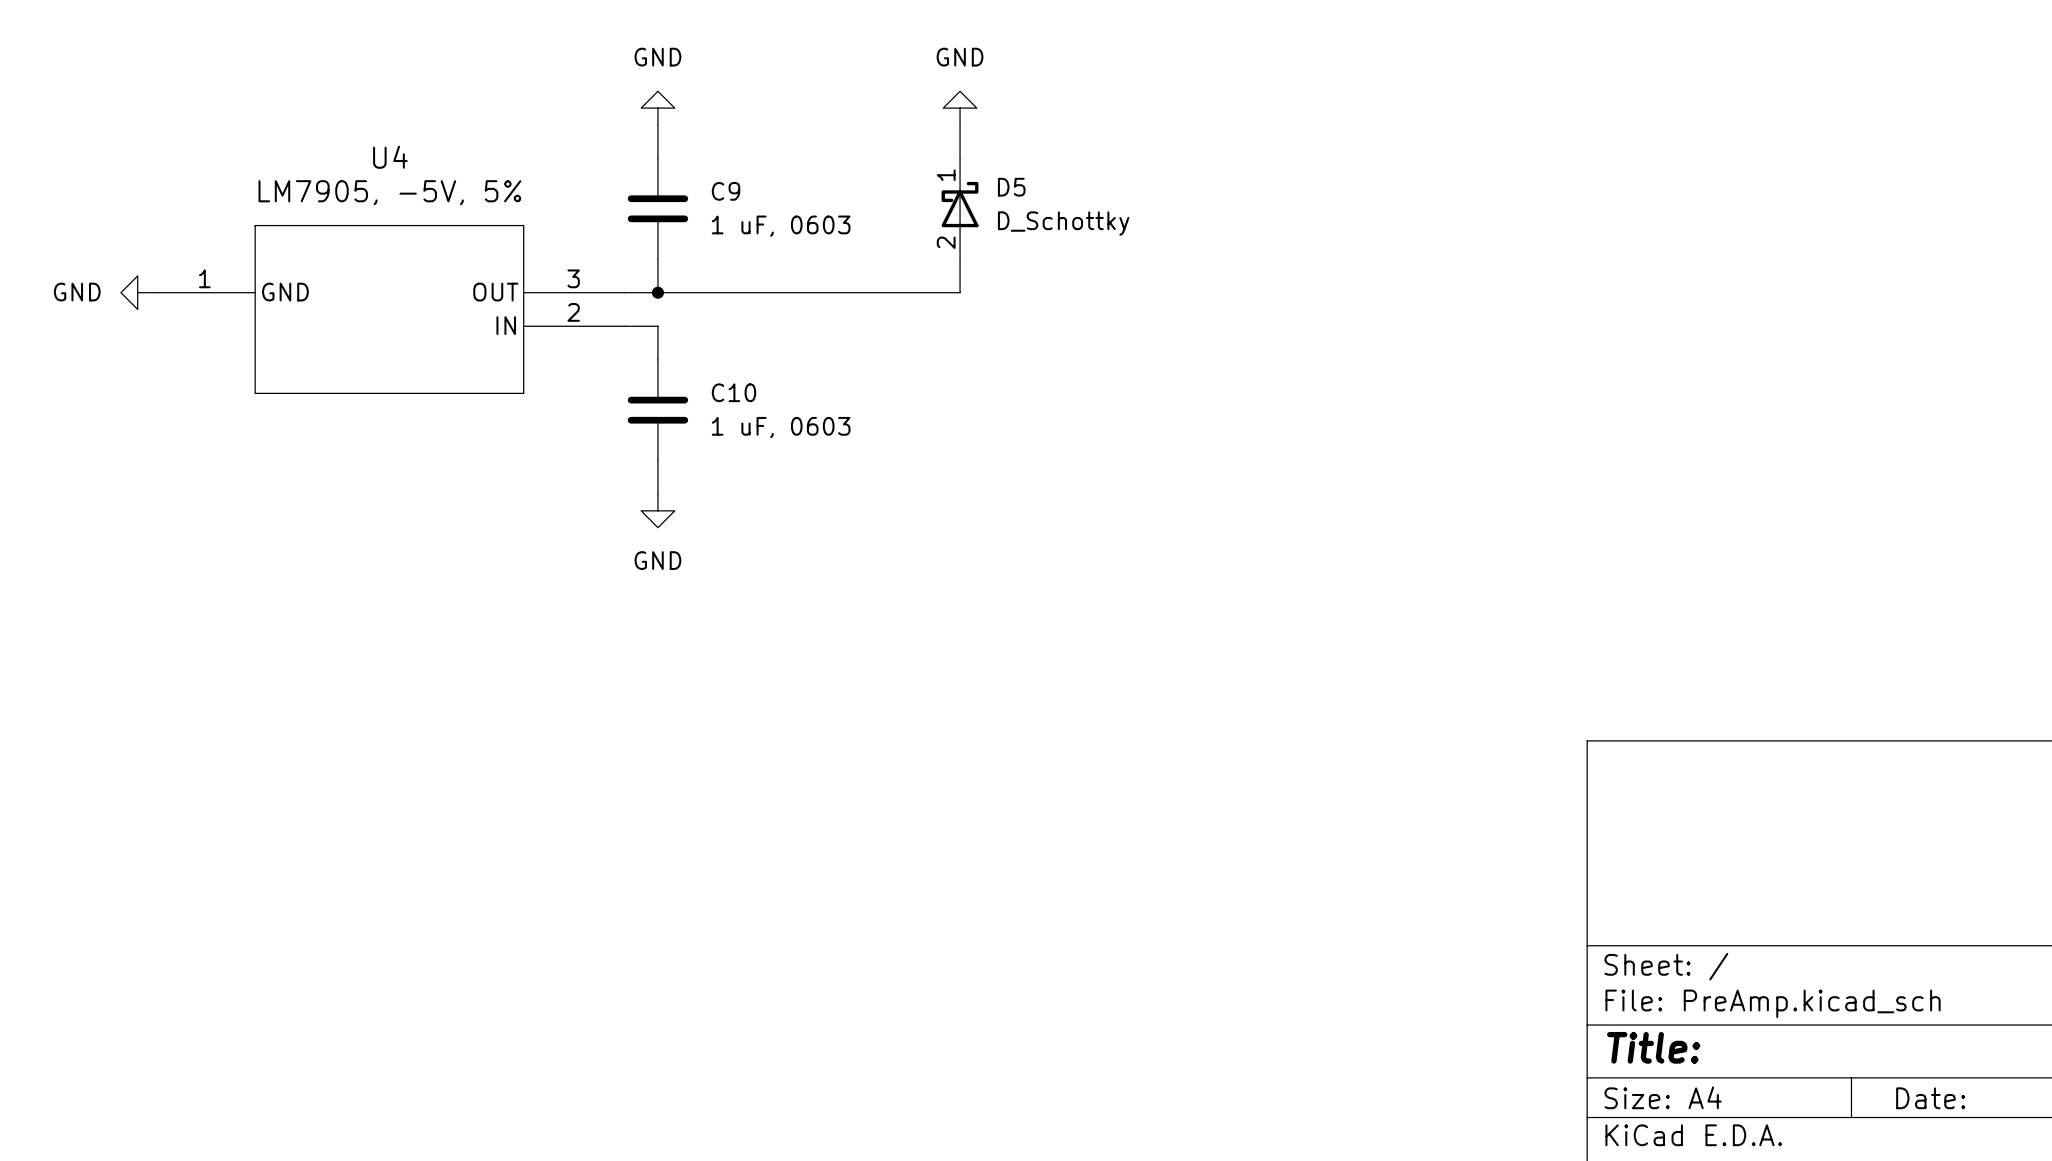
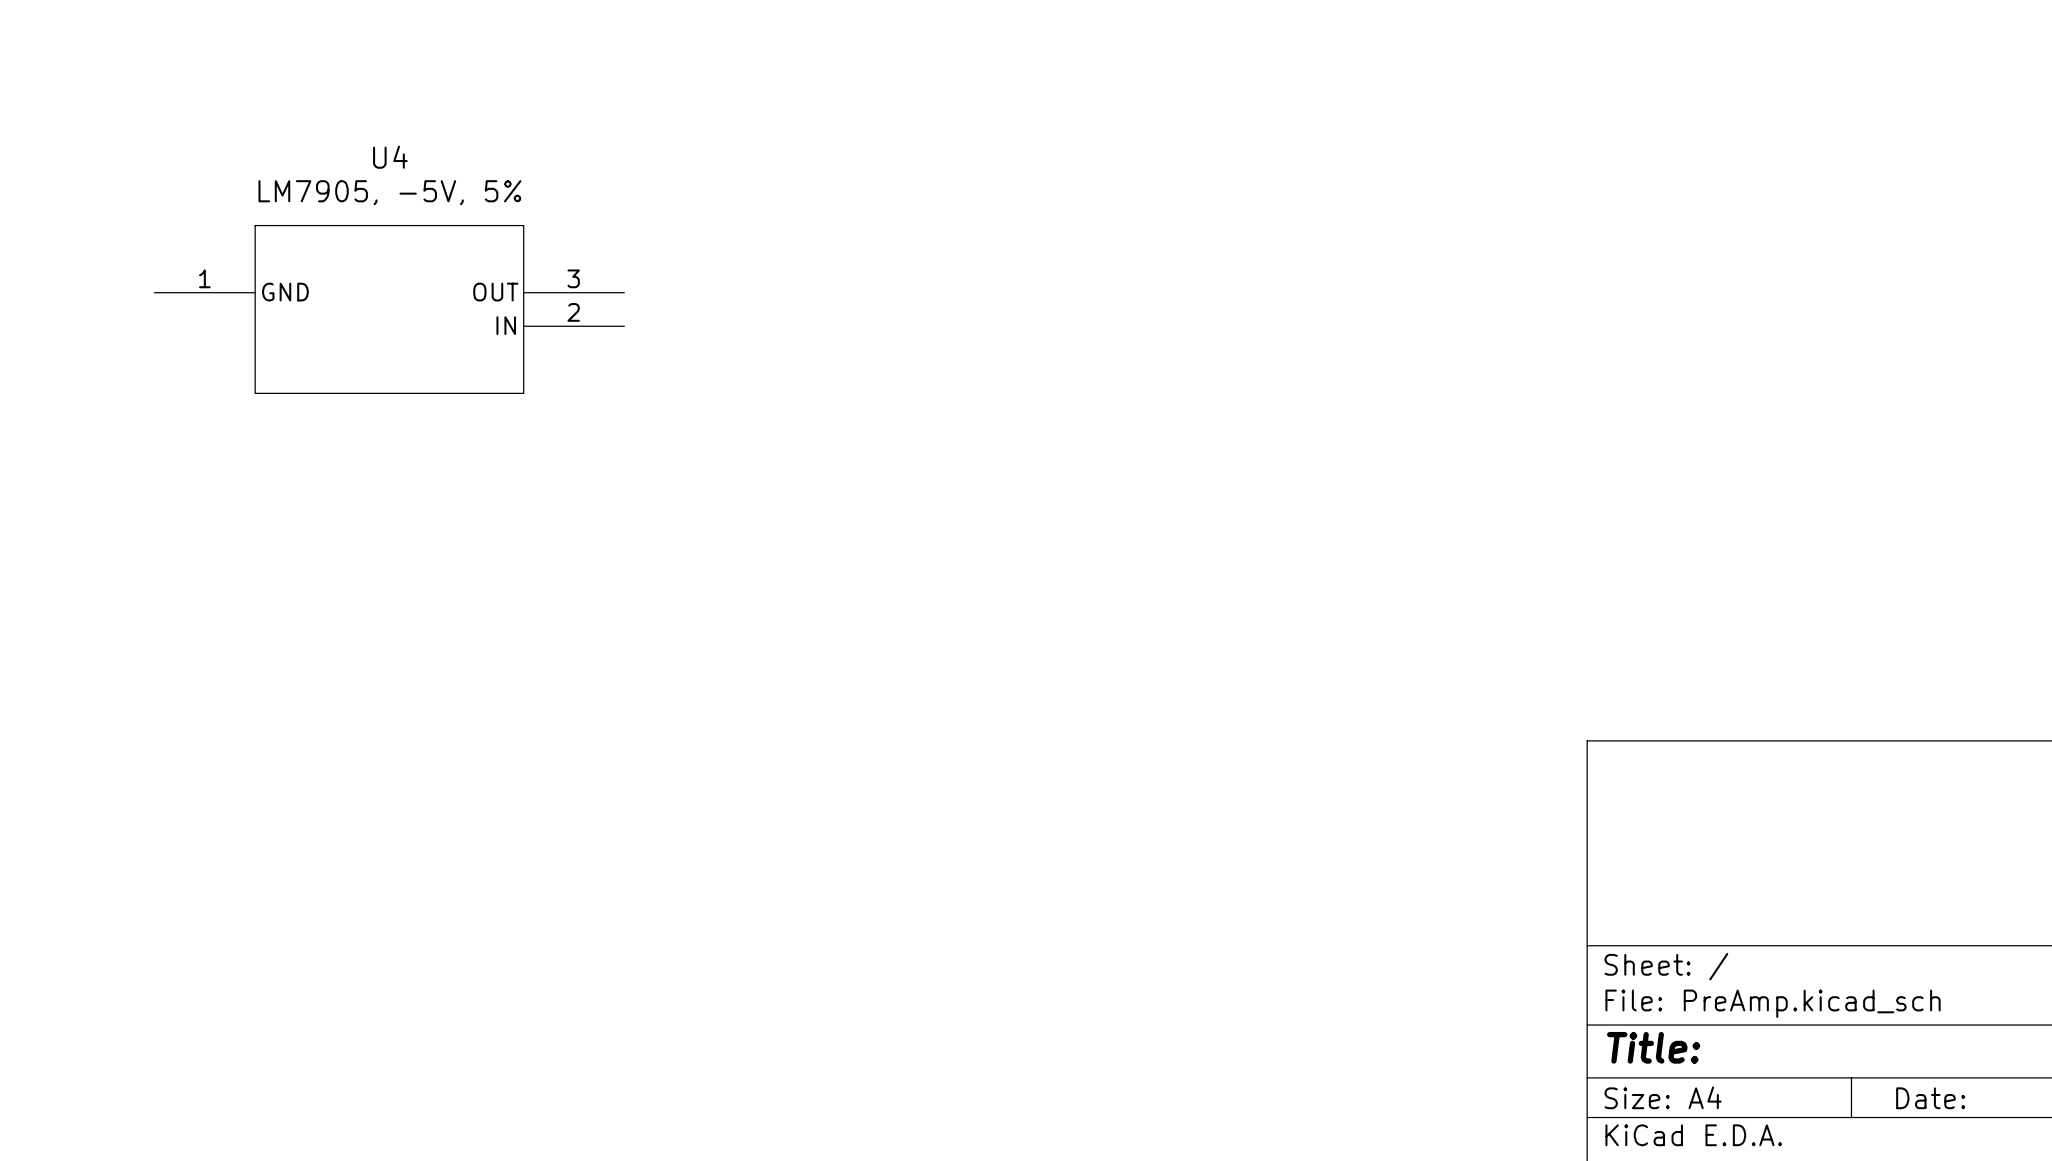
power symbol: GND (657, 108) -> none
power symbol: GND (960, 108) -> none
wire: (657, 124) (657, 158) -> none
wire: (960, 124) (960, 158) -> none
C9: 1 uF, 0603 (657, 208) -> none
D5: D_Schottky (960, 208) -> none
wire: (657, 259) (657, 292) -> none
wire: (960, 259) (960, 292) (624, 292) -> none
power symbol: GND (137, 292) -> none
junction: (657, 292) -> none
wire: (624, 326) (657, 326) (657, 359) -> none
C10: 1 uF, 0603 (657, 410) -> none
wire: (657, 460) (657, 494) -> none
power symbol: GND (657, 510) -> none

